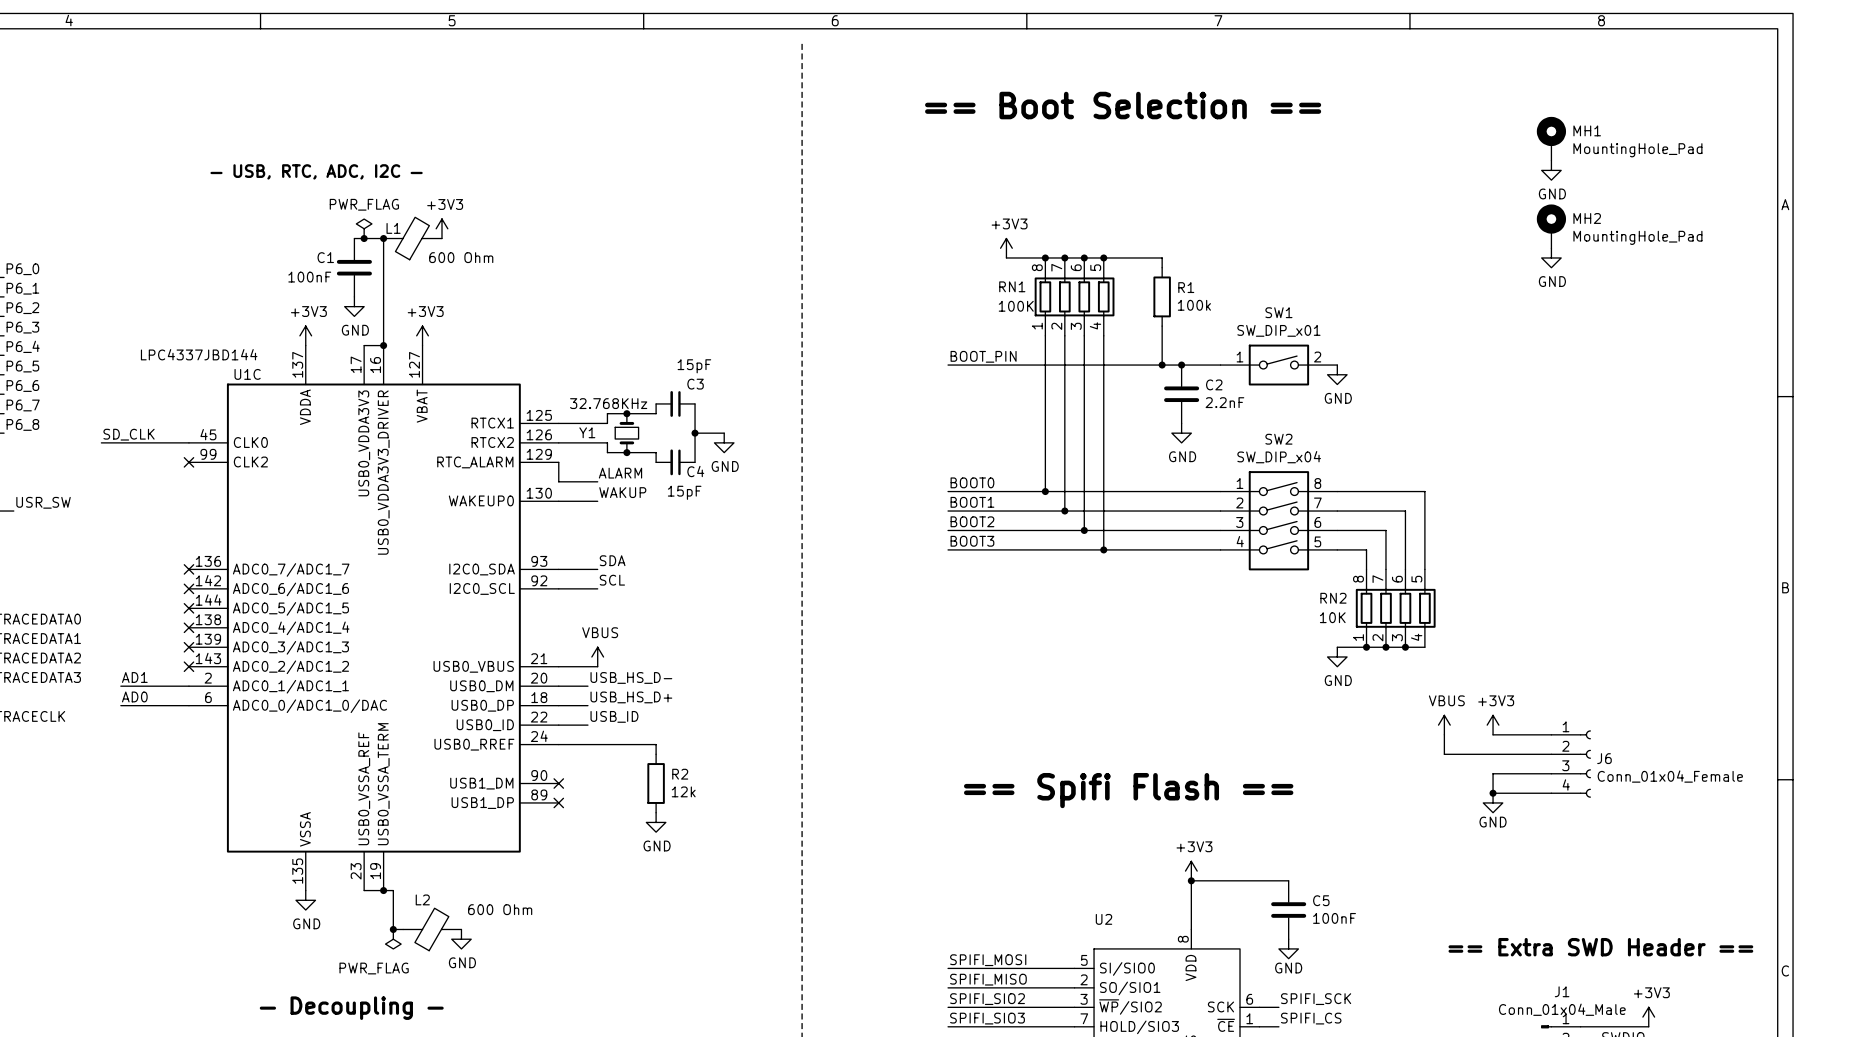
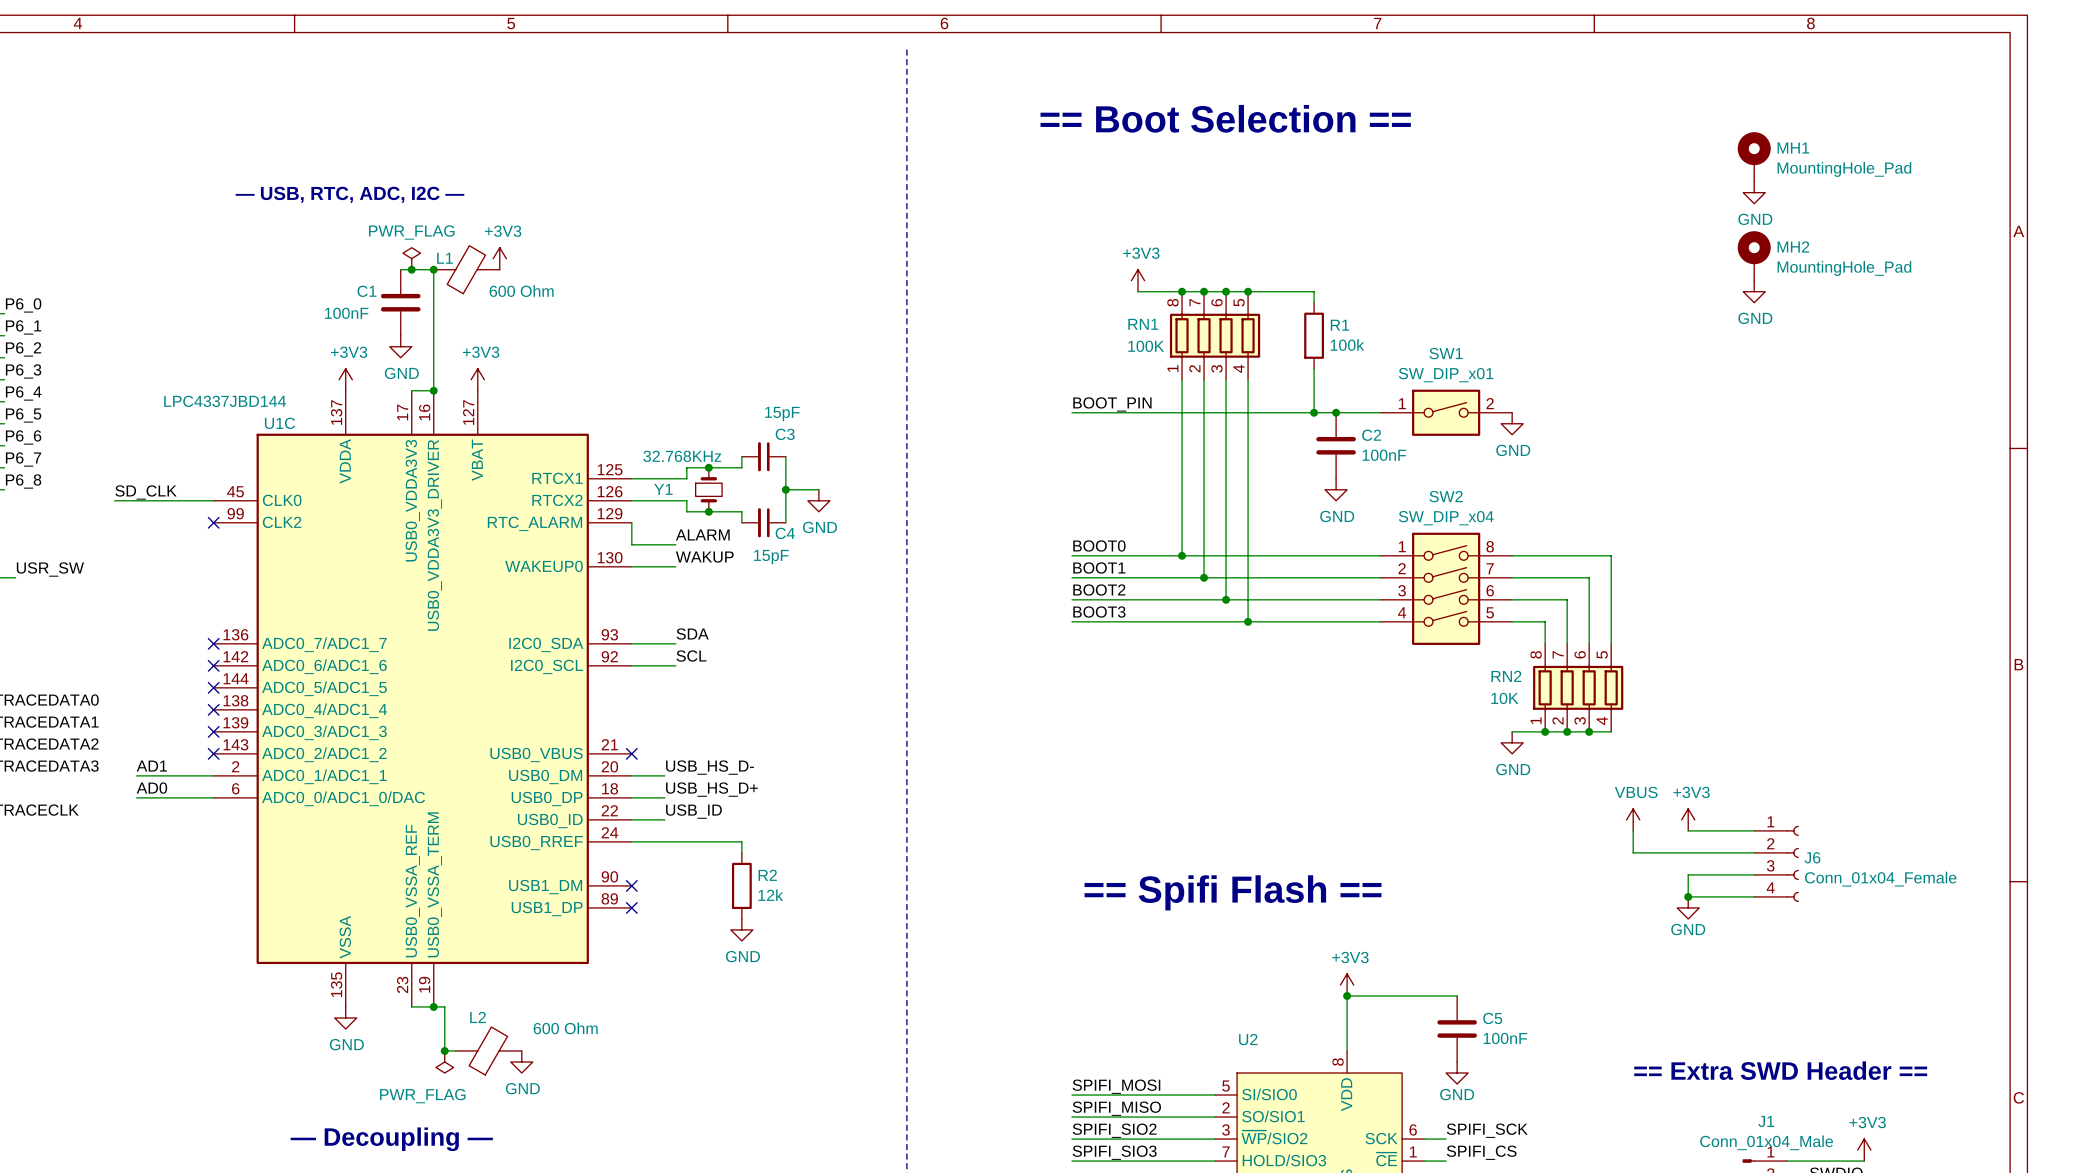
C2 value: 2.2nF (1224, 402) -> 100nF (1384, 455)
power symbol: VBUS (597, 656) -> none
wire: (558, 666) (597, 666) -> none
no-connect mark: none -> (631, 753)

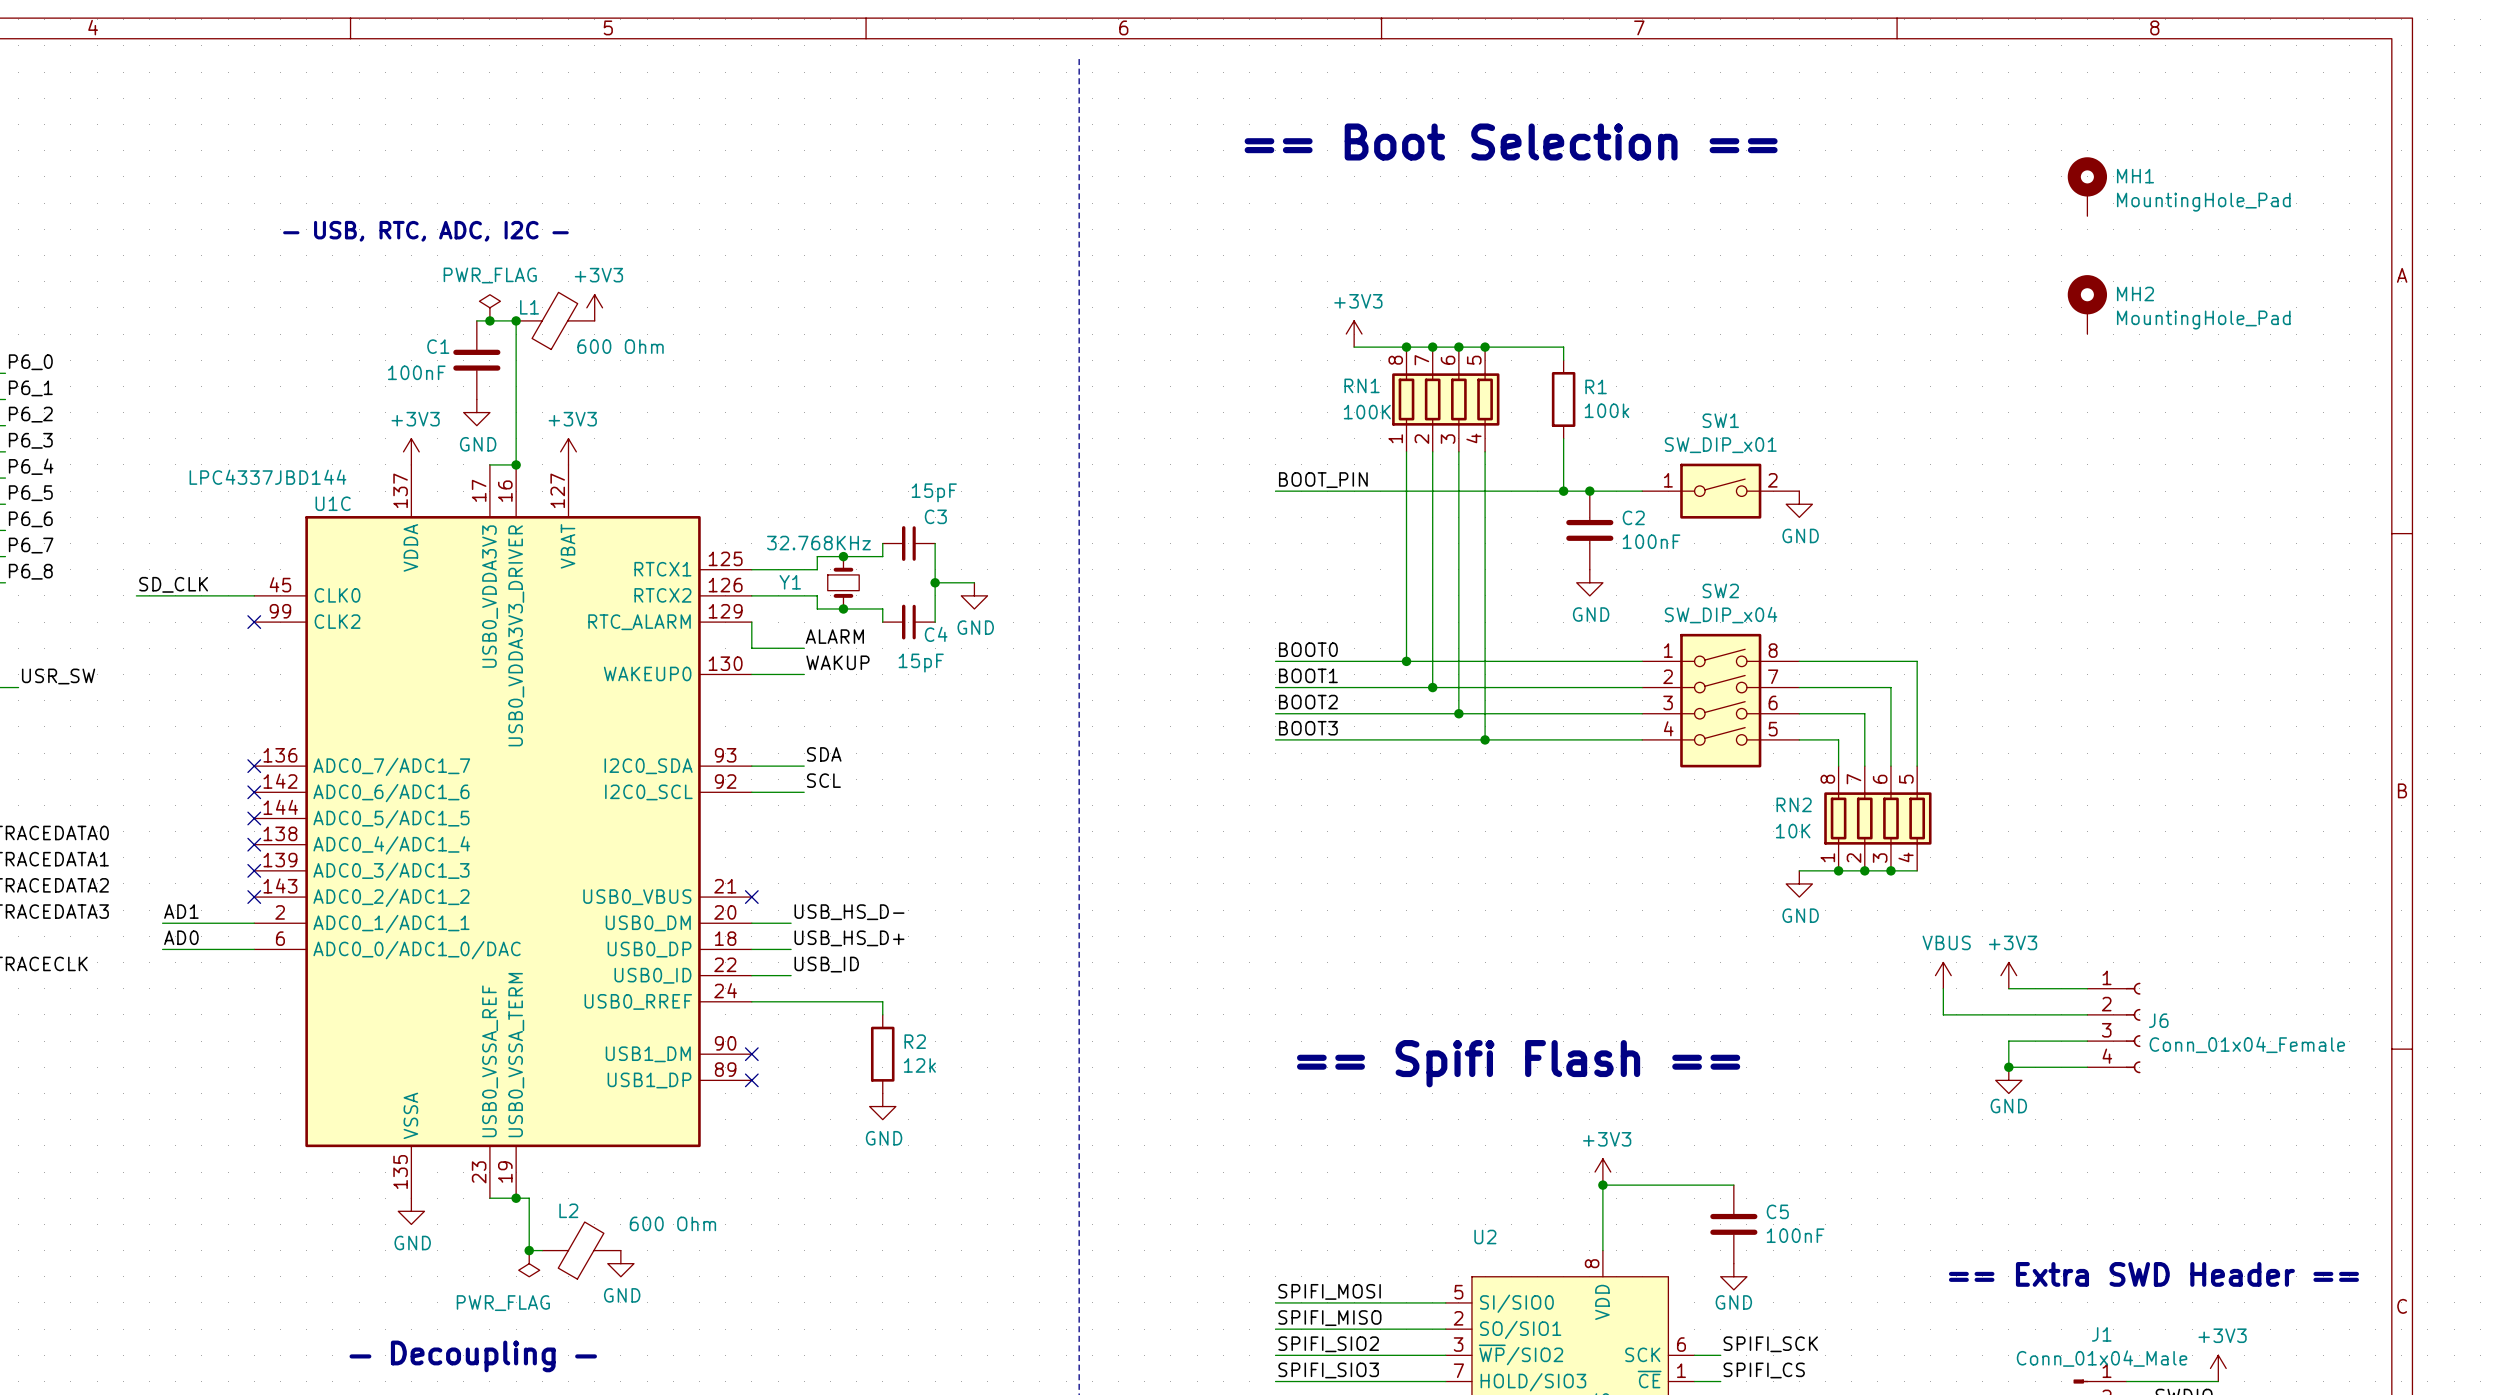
power symbol: GND (1754, 192) -> none
power symbol: GND (1754, 291) -> none

